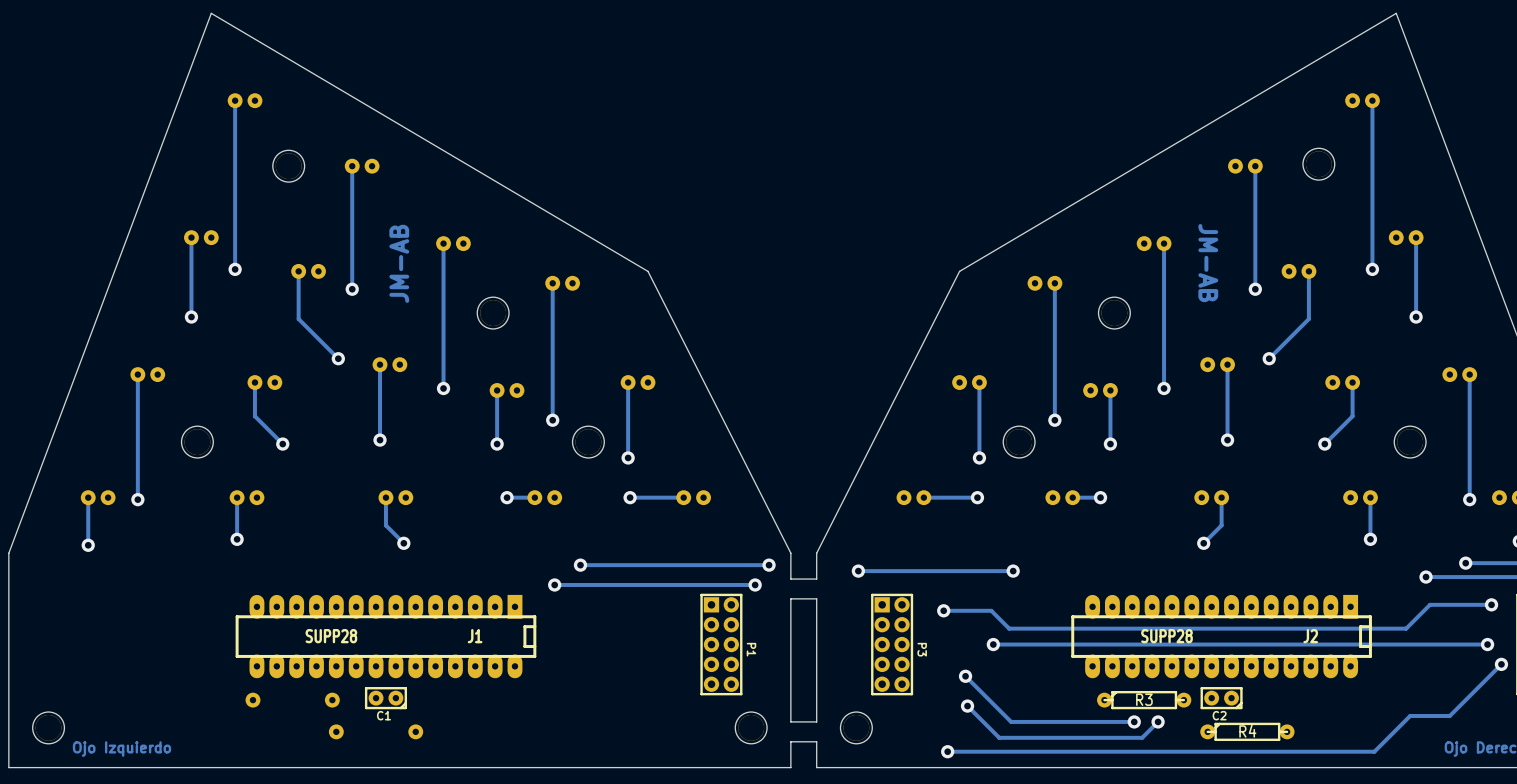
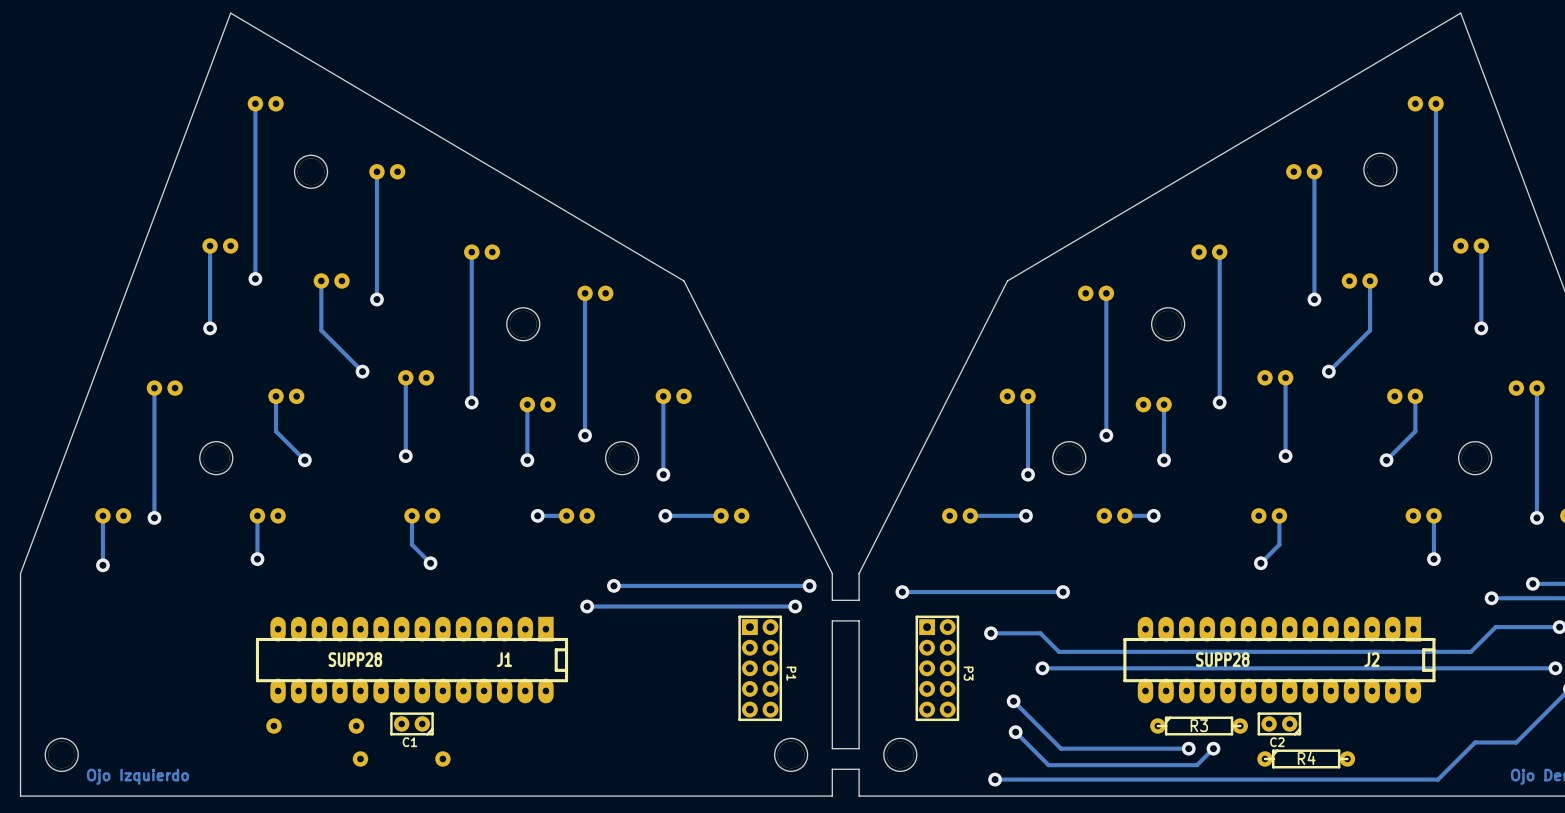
text: JM-AB (399, 263) -> none
text: JM-AB (1208, 263) -> none

